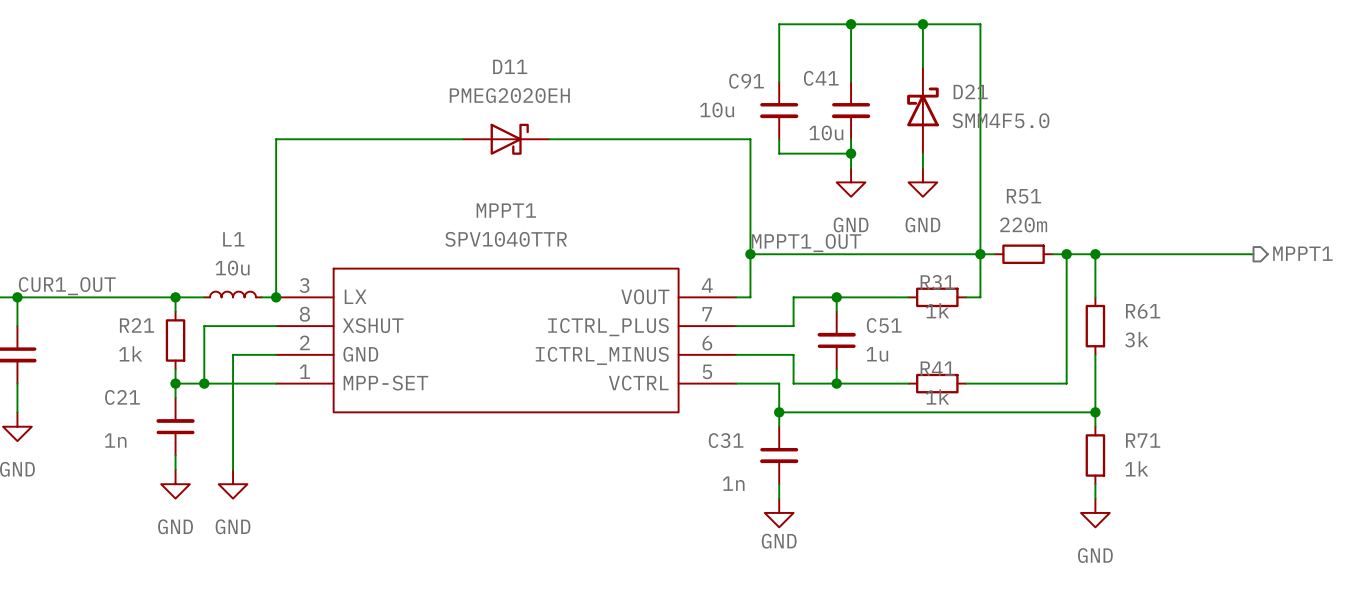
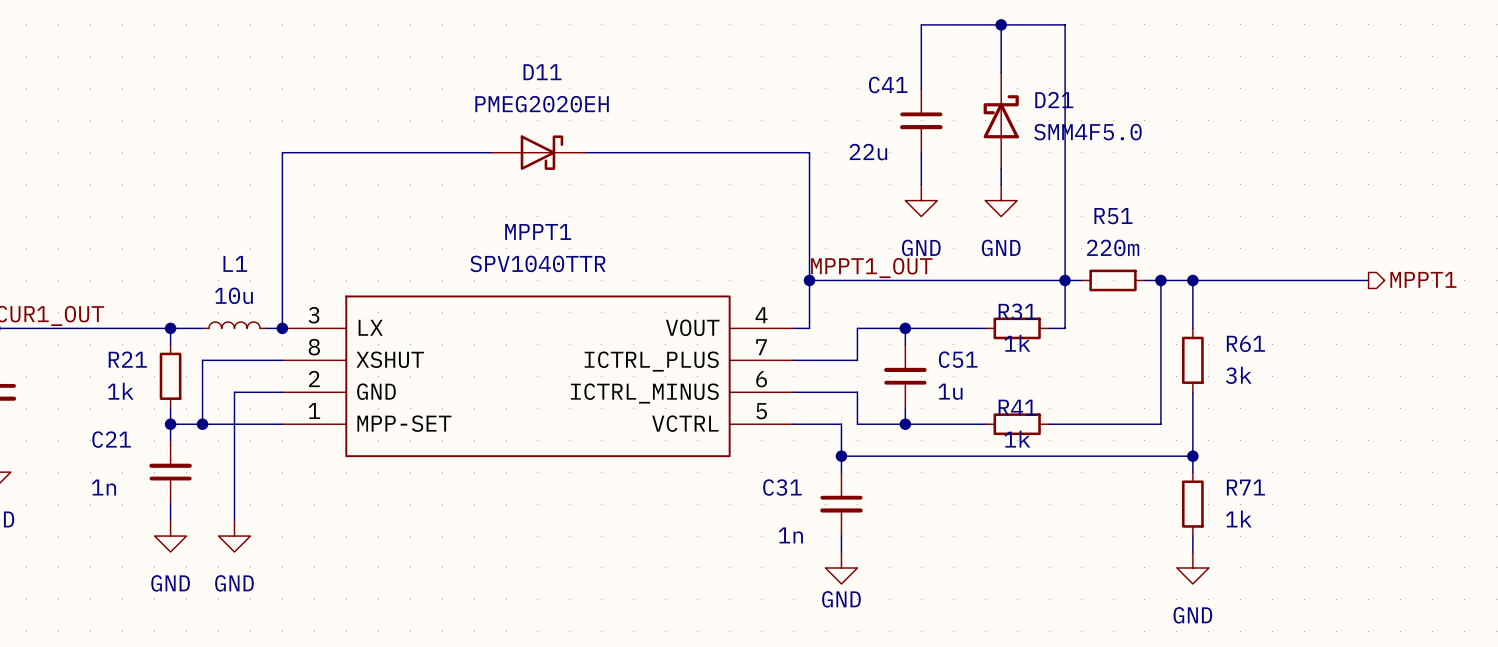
wire: (851, 24) (779, 24) (779, 81) -> none
junction: (851, 24) -> none
C91: 10u (779, 110) -> none
C41 value: 10u (826, 132) -> 22u (868, 152)
wire: (779, 139) (779, 153) (851, 153) -> none
junction: (851, 153) -> none

